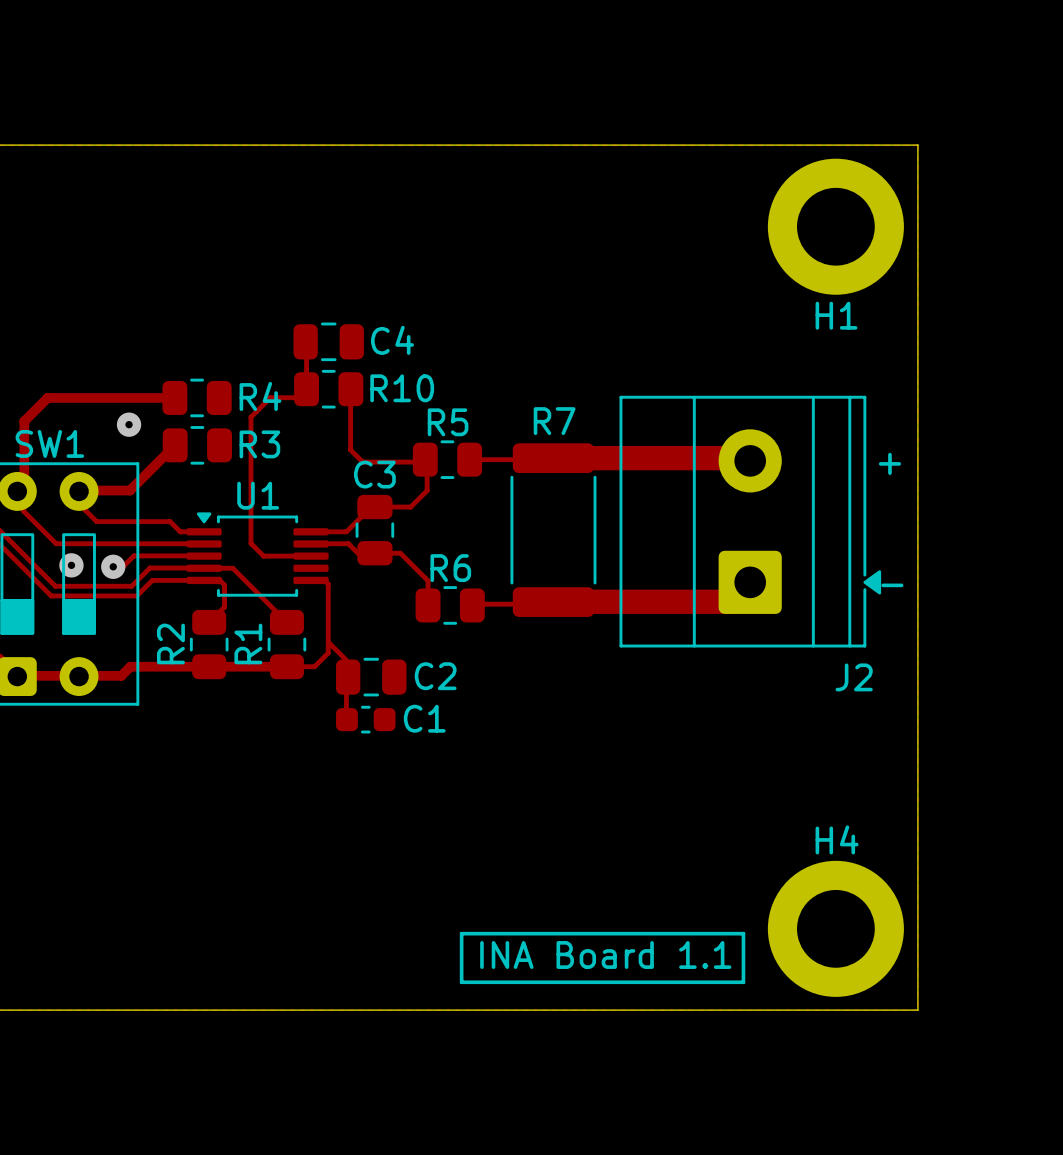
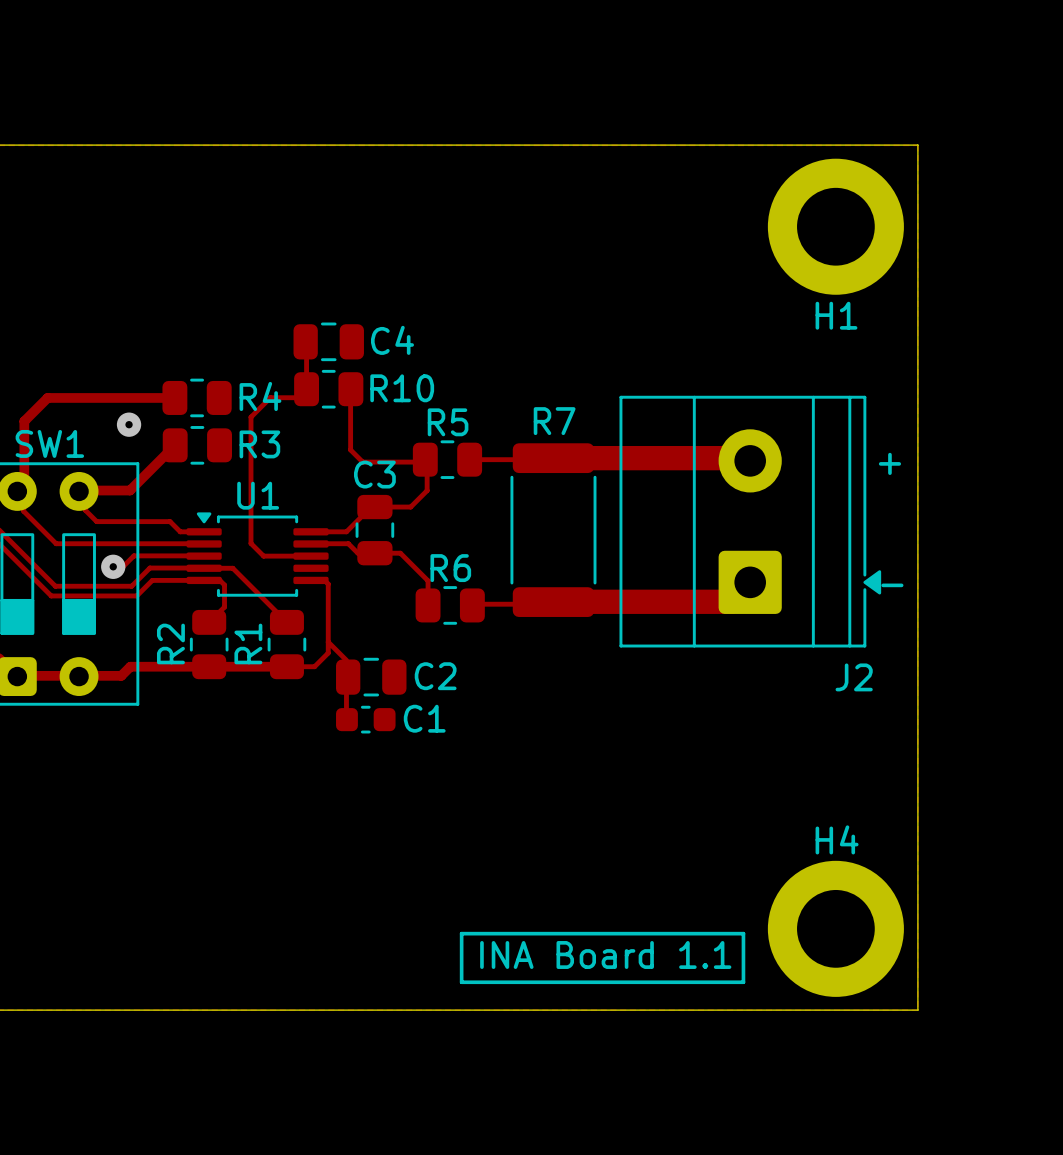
via: (71, 565) -> none

